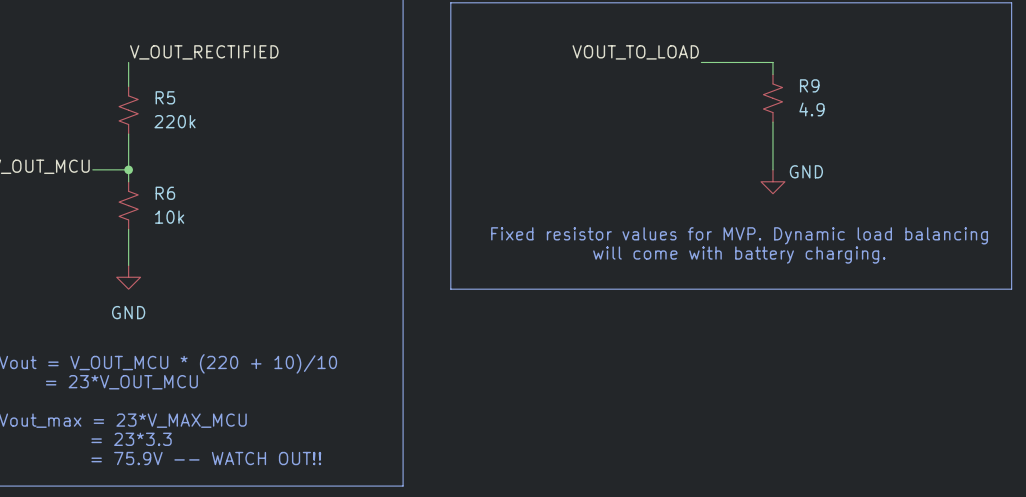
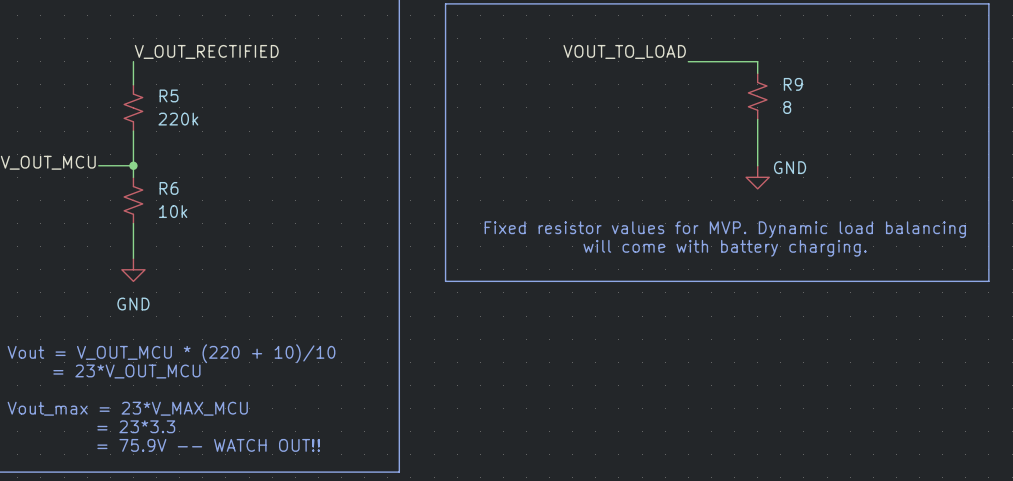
R9 value: 4.9 (812, 109) -> 8 (787, 107)

